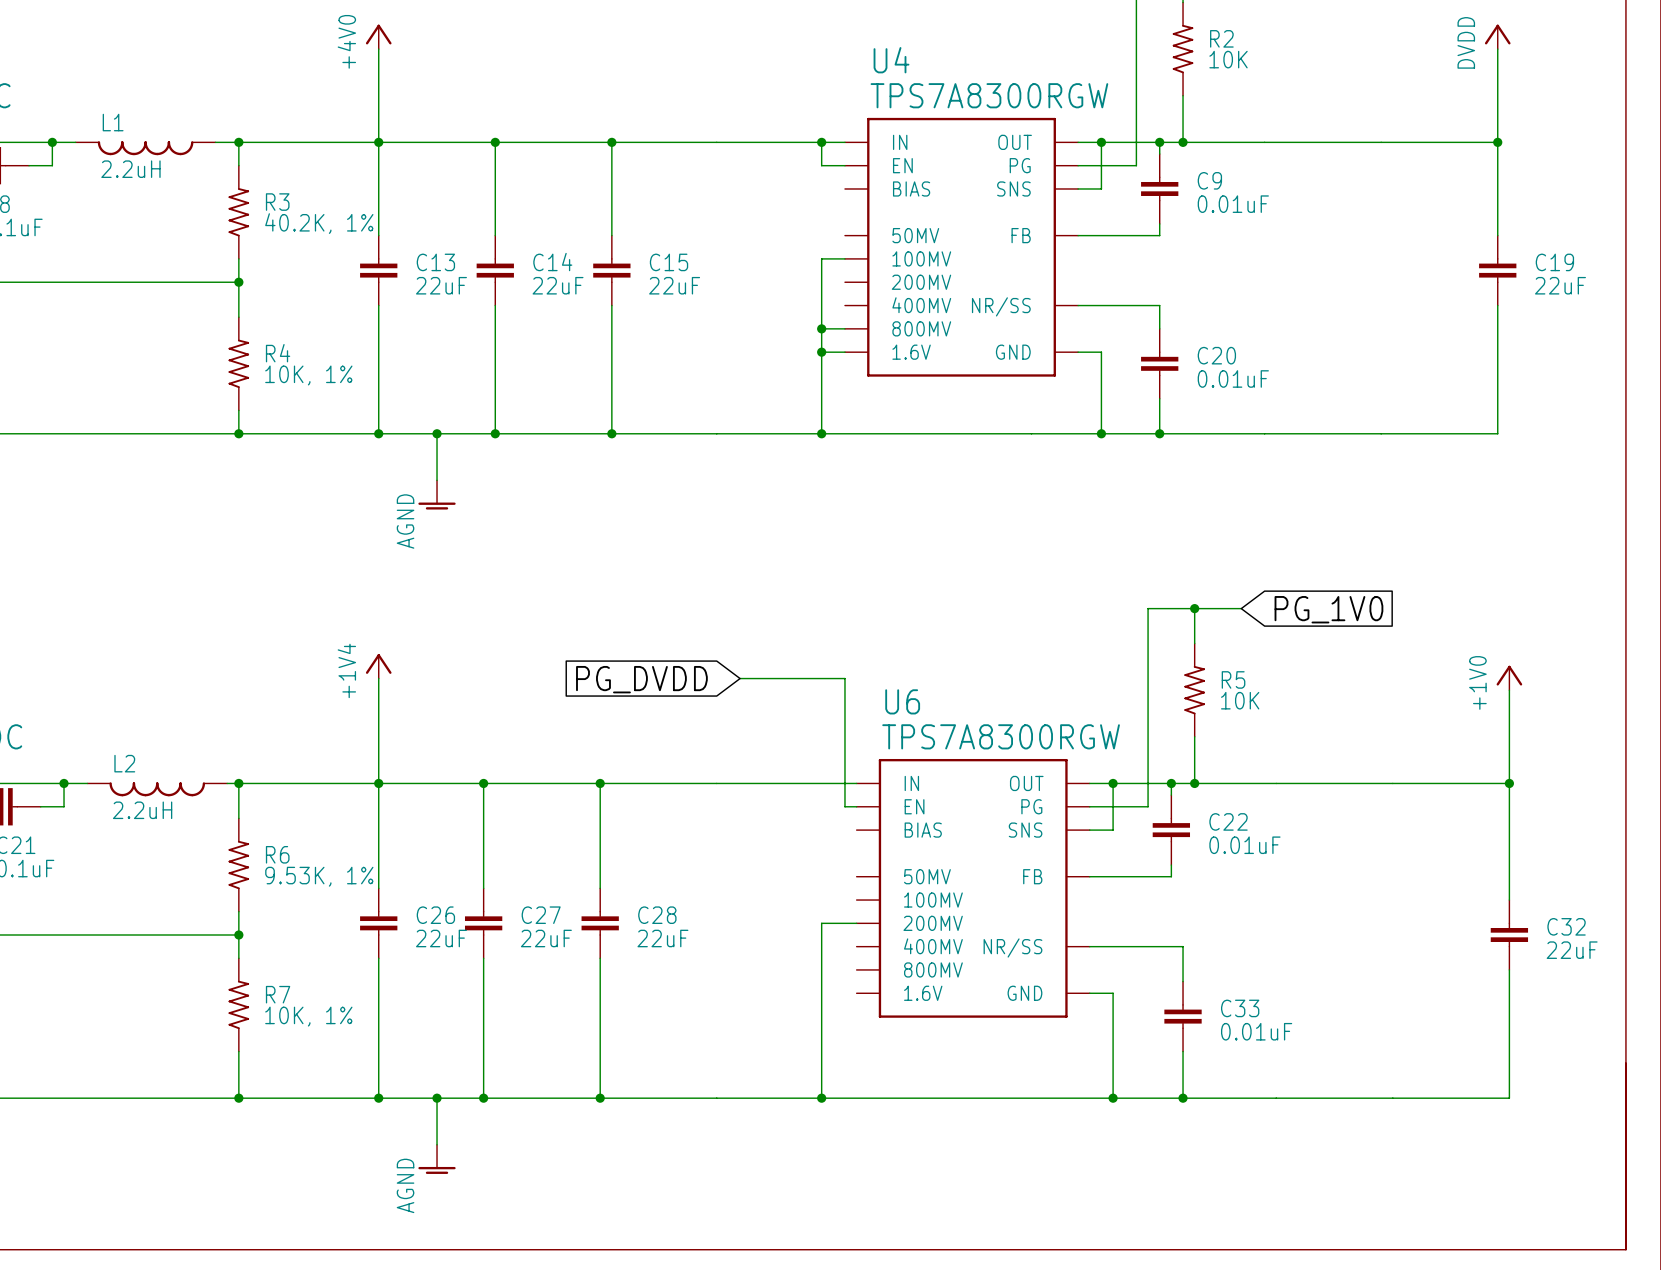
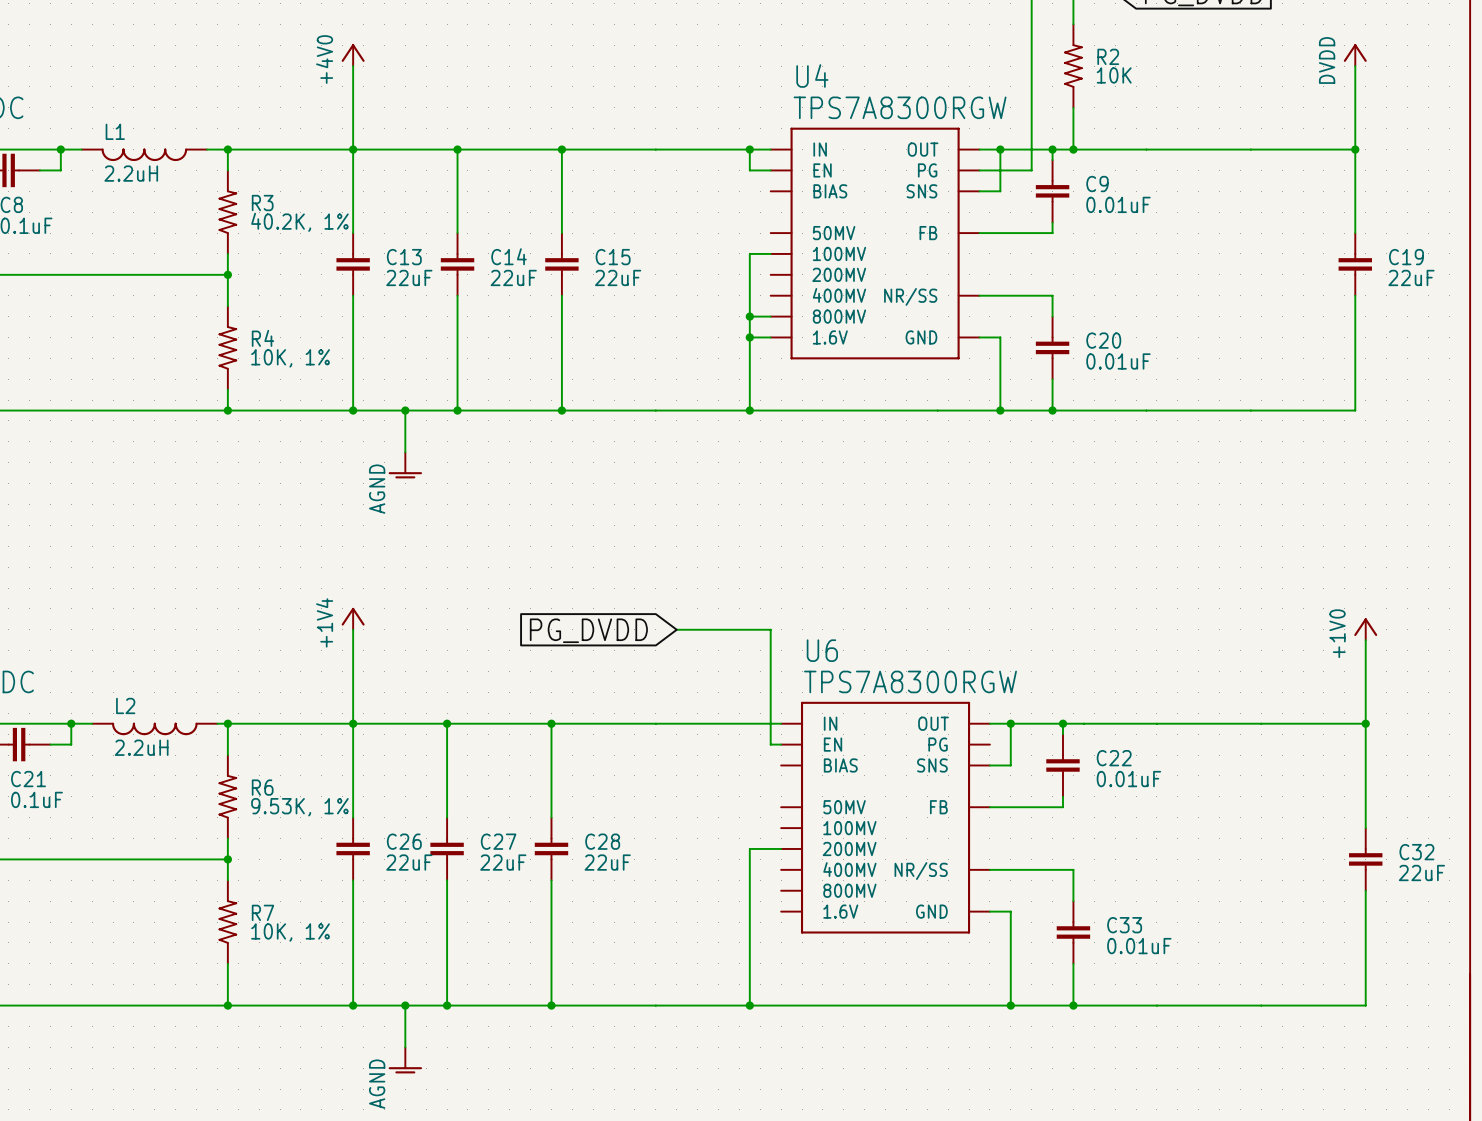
wire: (1194, 608) (1194, 643) -> none
junction: (1194, 608) -> none
wire: (1241, 608) (1148, 608) (1148, 806) (1089, 806) -> none
global label: PG_1V0 (1328, 609) -> none
R5: 10K (1194, 690) -> none
wire: (1194, 736) (1194, 783) -> none
junction: (1194, 783) -> none

